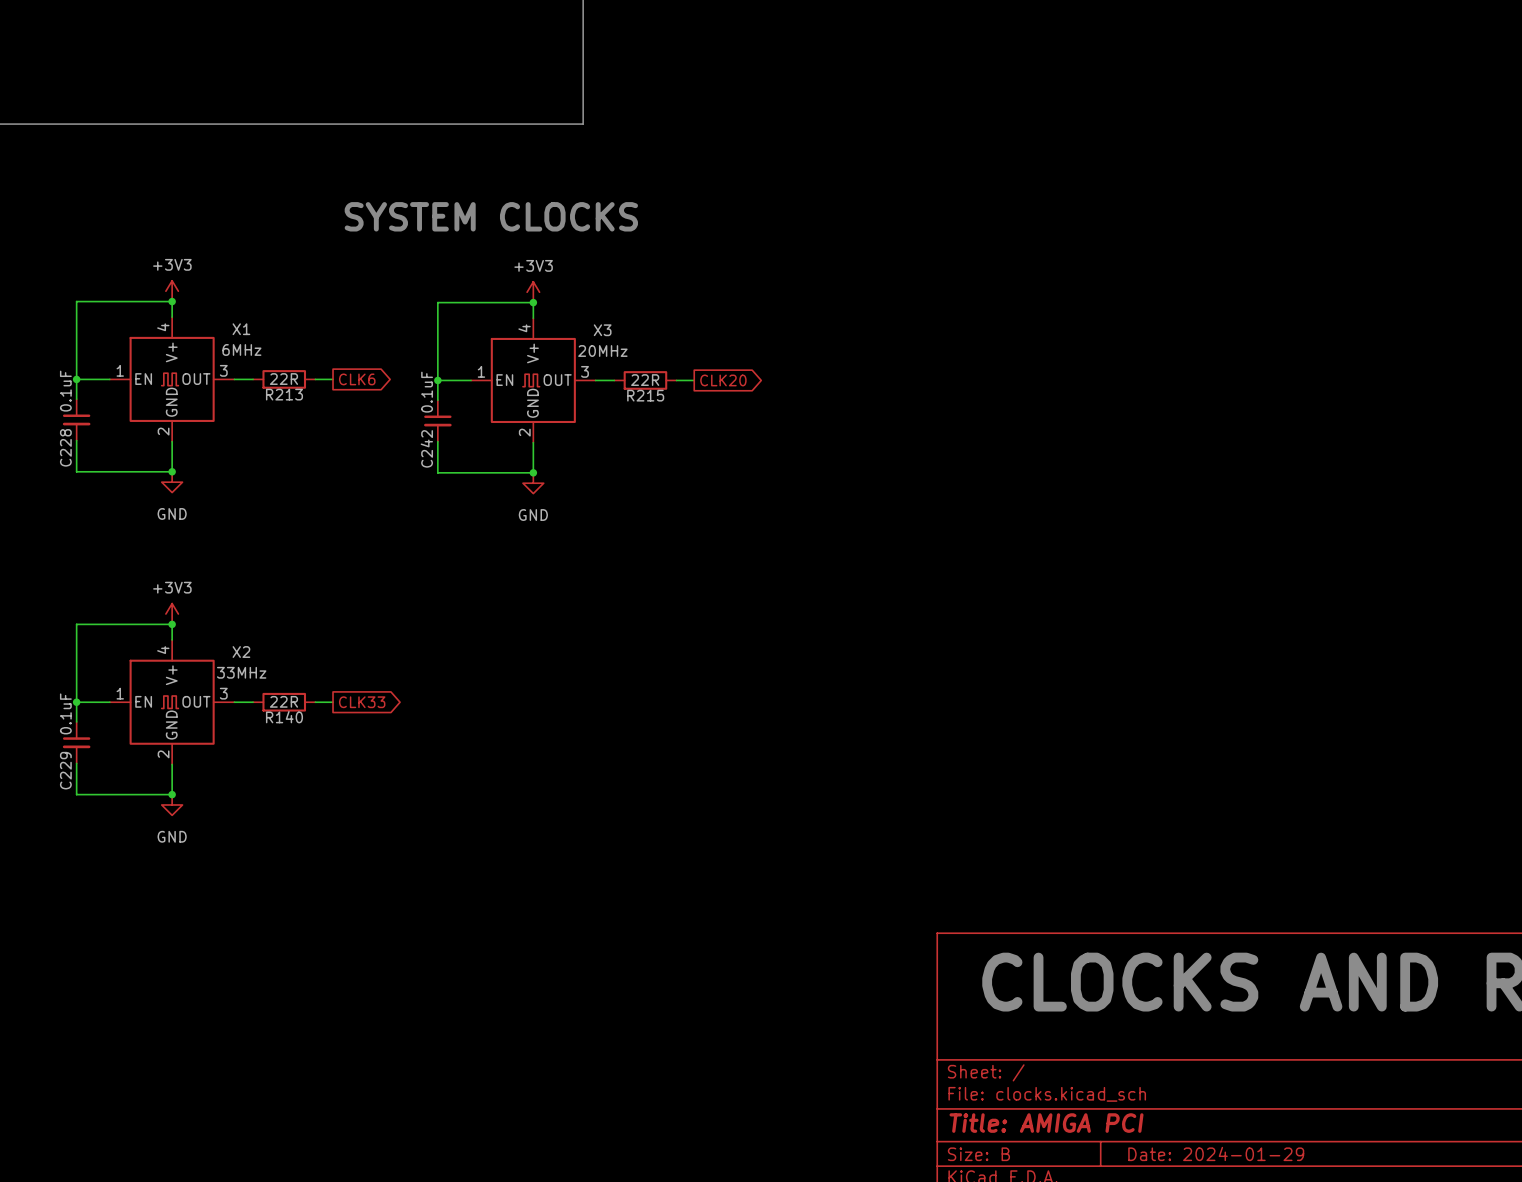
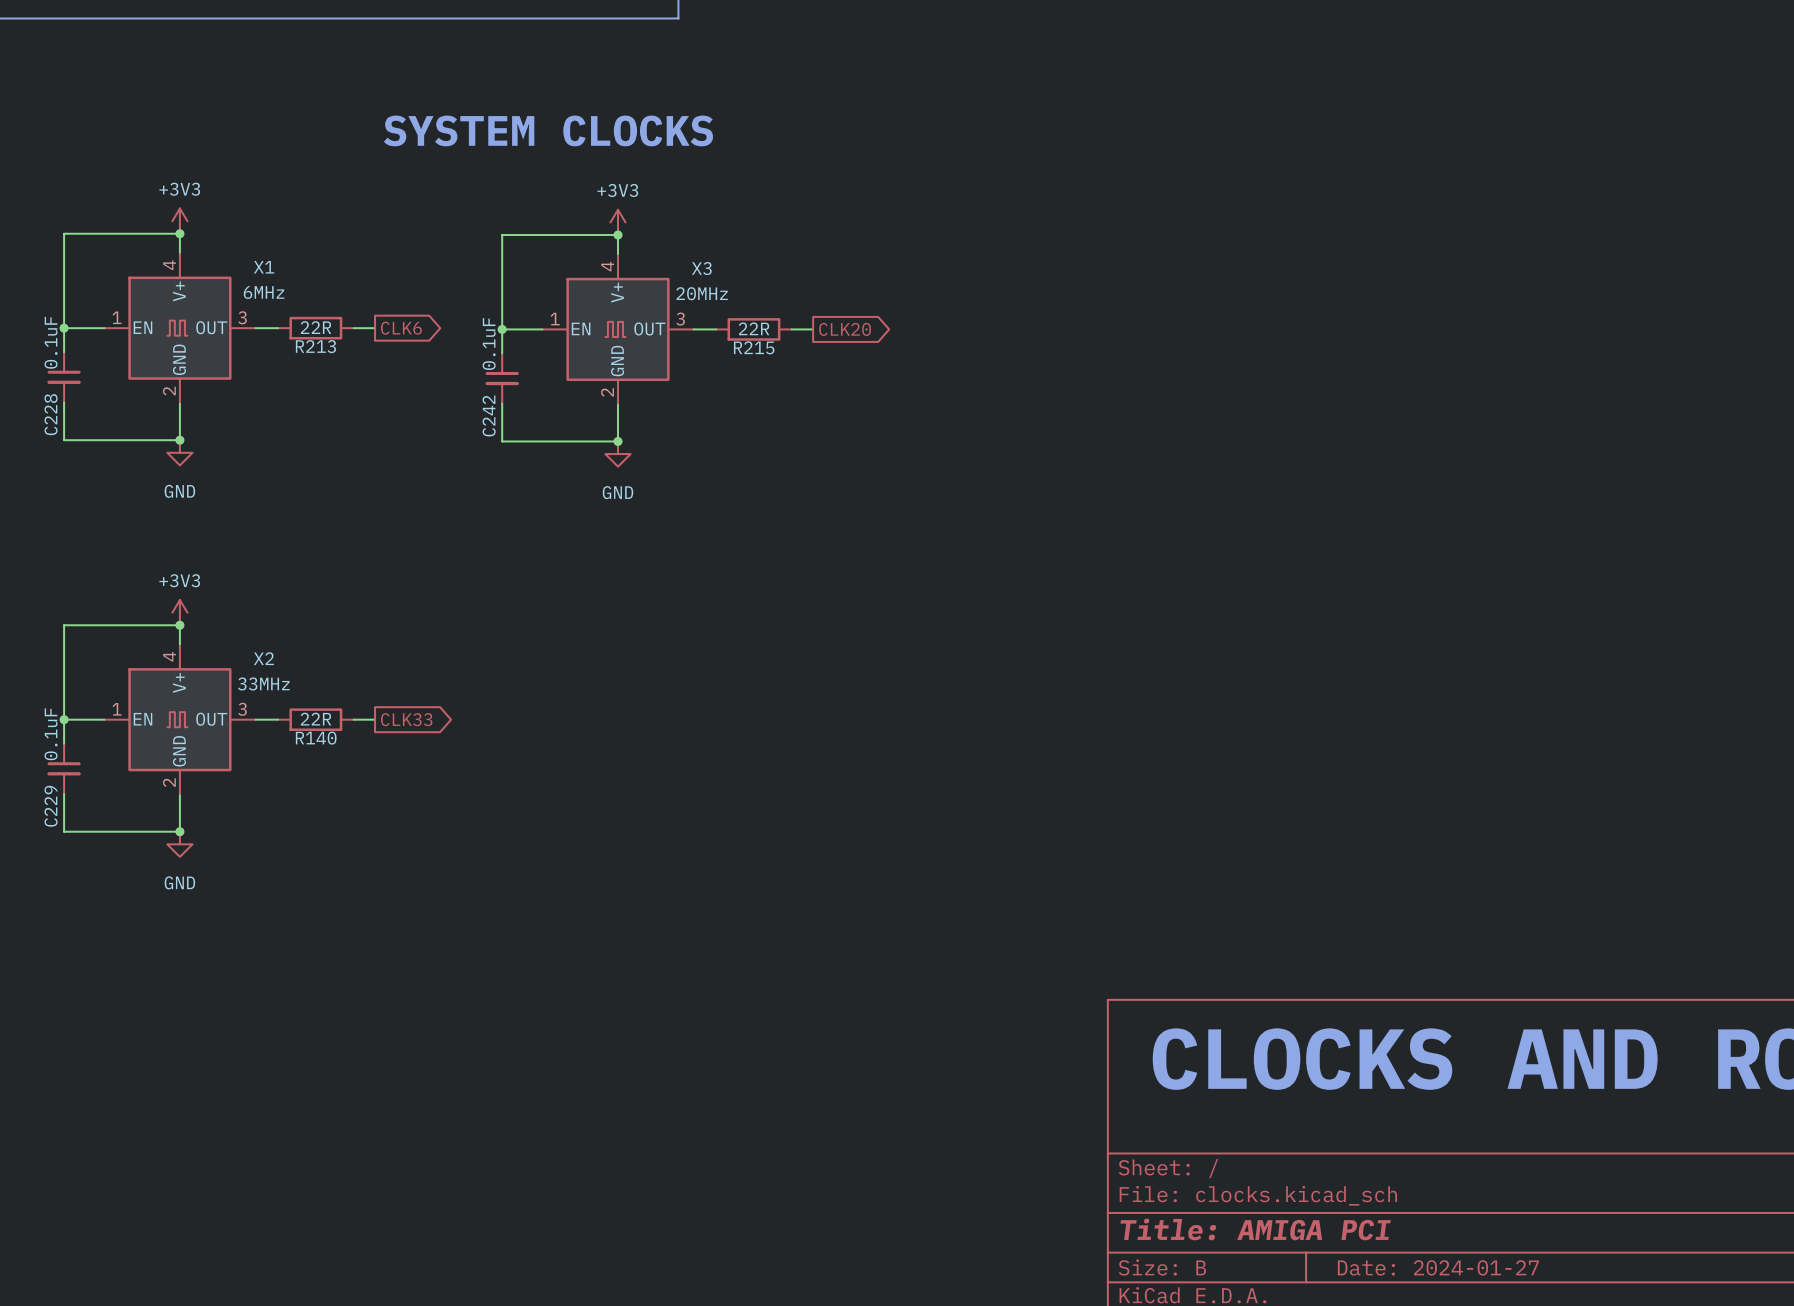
title block: Date: 2024-01-29 (1216, 1153) -> Date: 2024-01-27 (1438, 1267)

